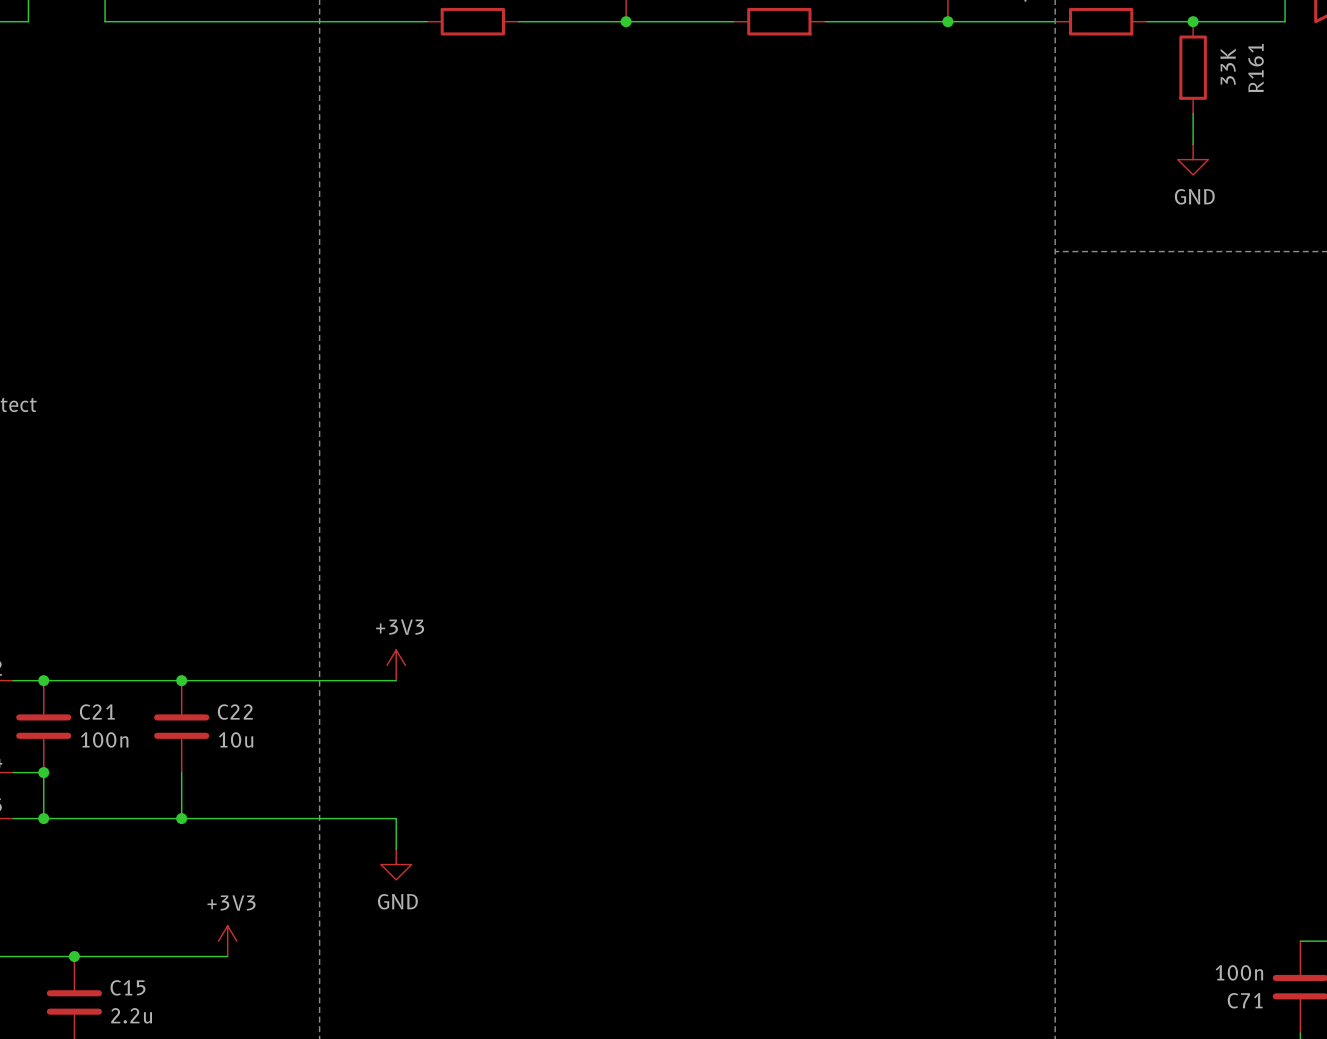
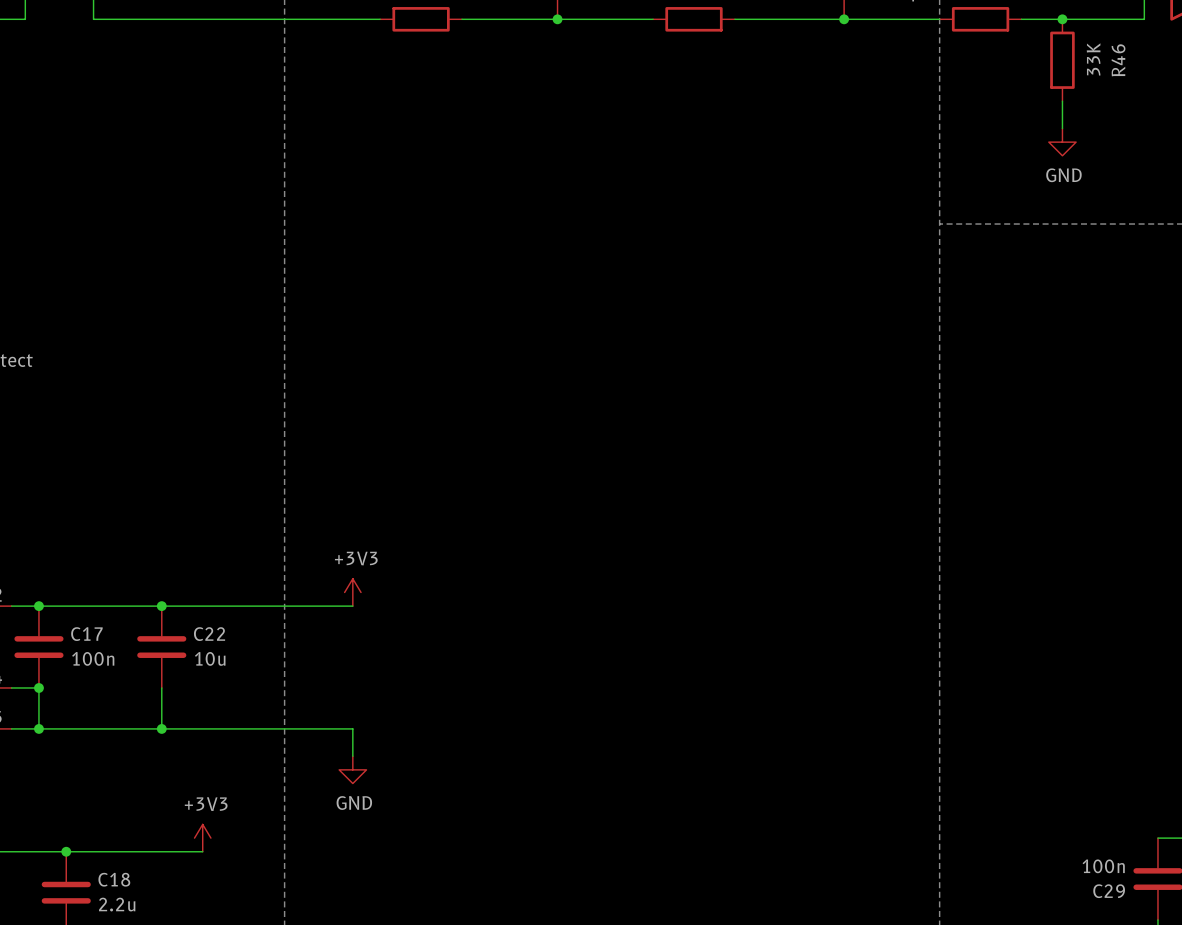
R161 name: R161 (1256, 68) -> R46 (1118, 60)
C21 name: C21 (97, 712) -> C17 (86, 634)
C15 name: C15 (127, 987) -> C18 (114, 879)
C71 name: C71 (1245, 1000) -> C29 (1109, 891)

